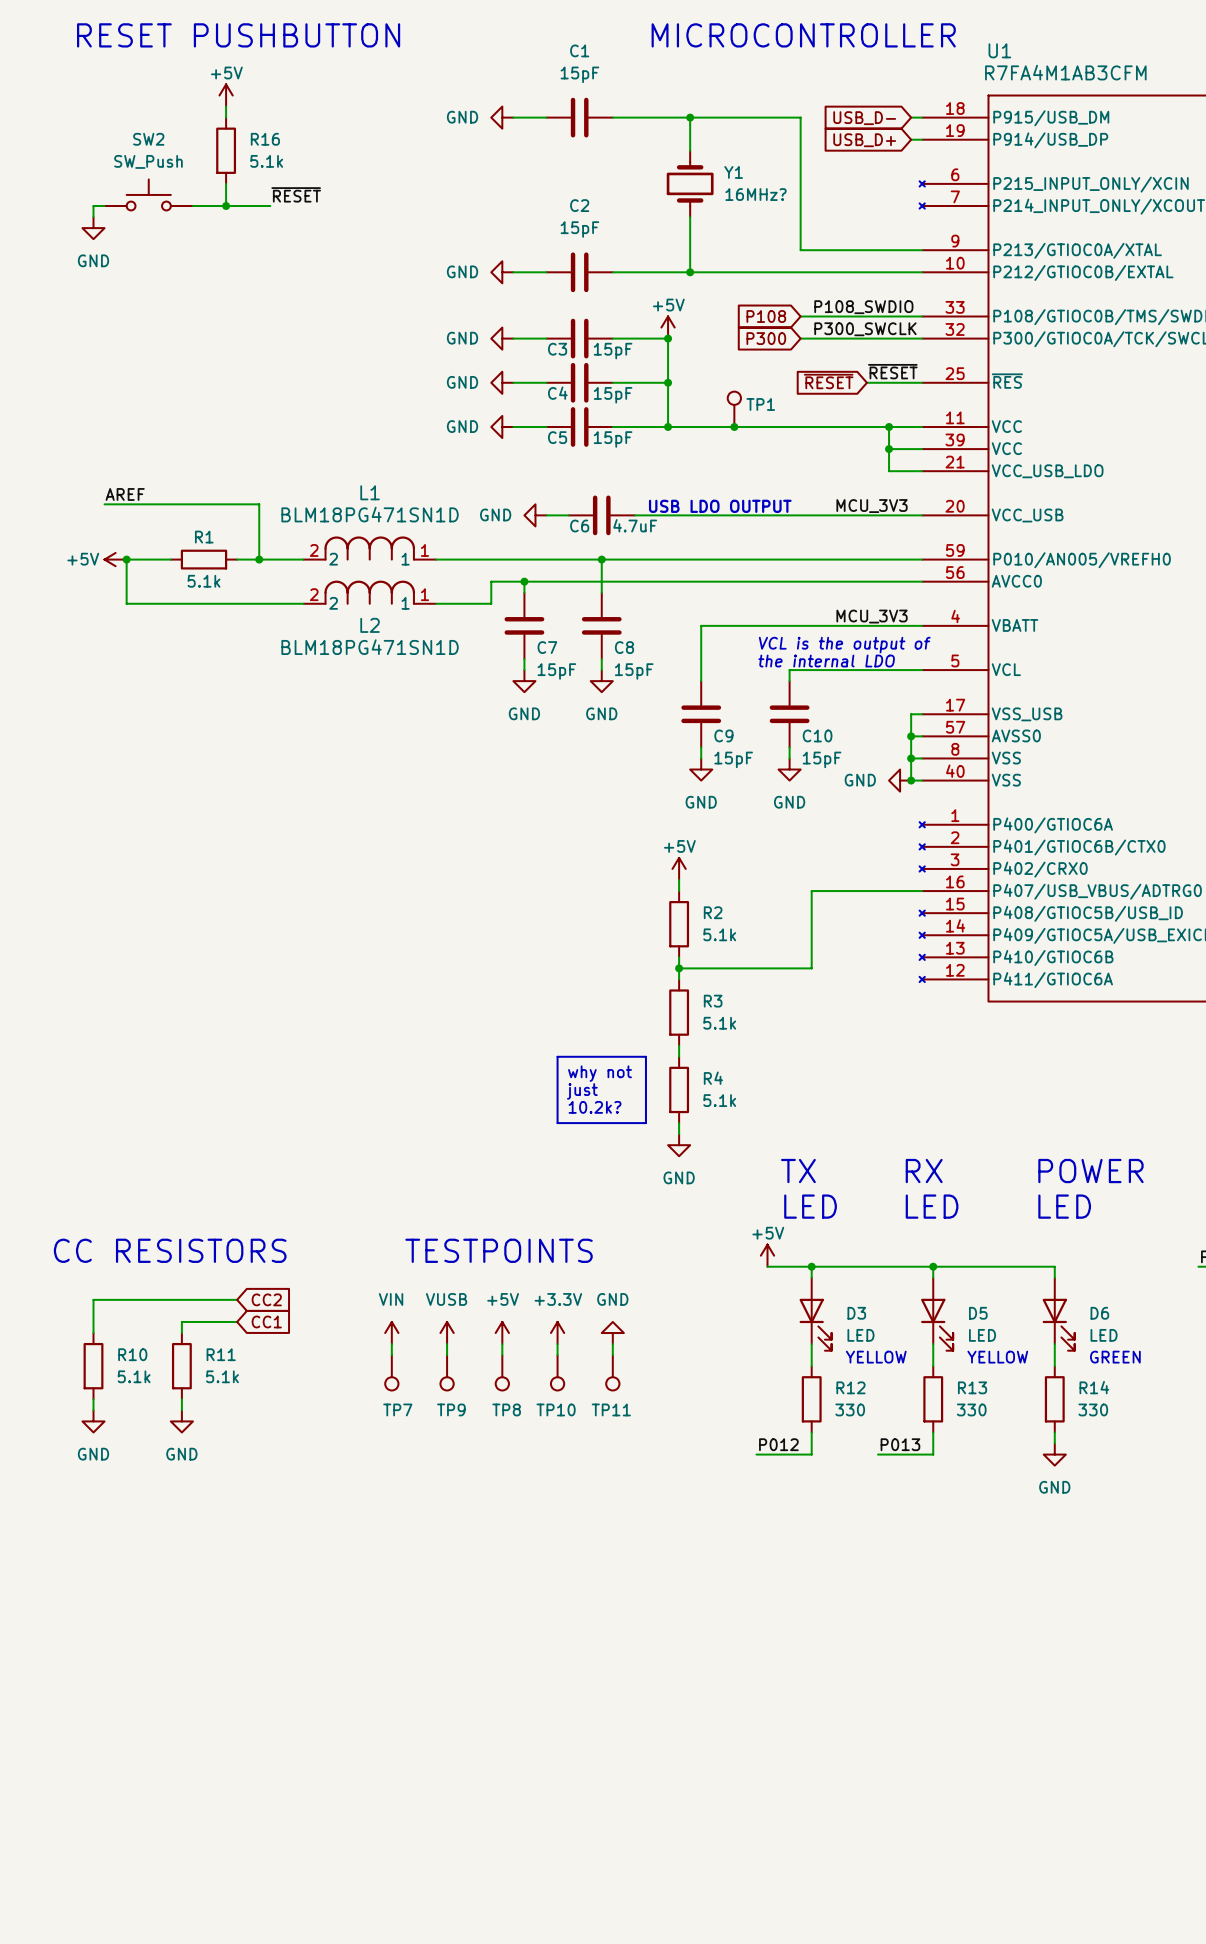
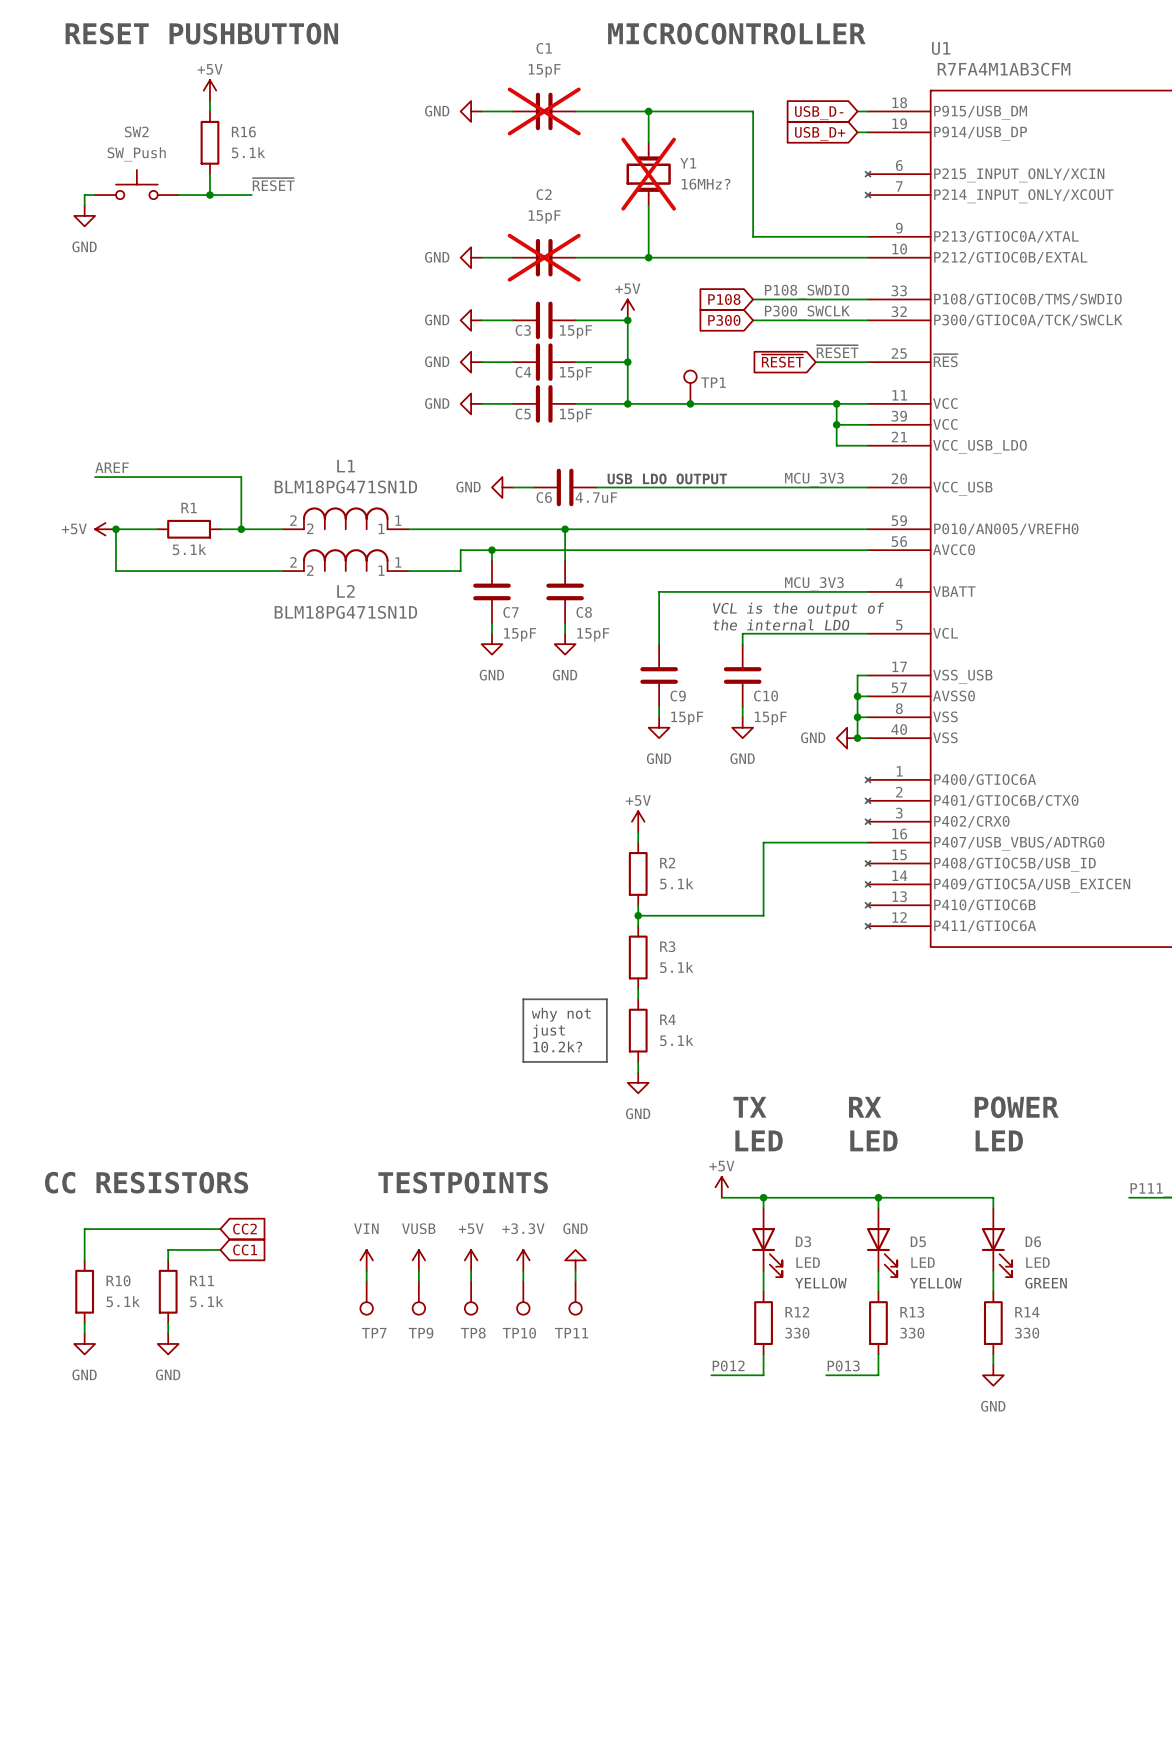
C1 do-not-place cross: none -> (544, 111)
Y1 do-not-place cross: none -> (648, 174)
C2 do-not-place cross: none -> (544, 257)

